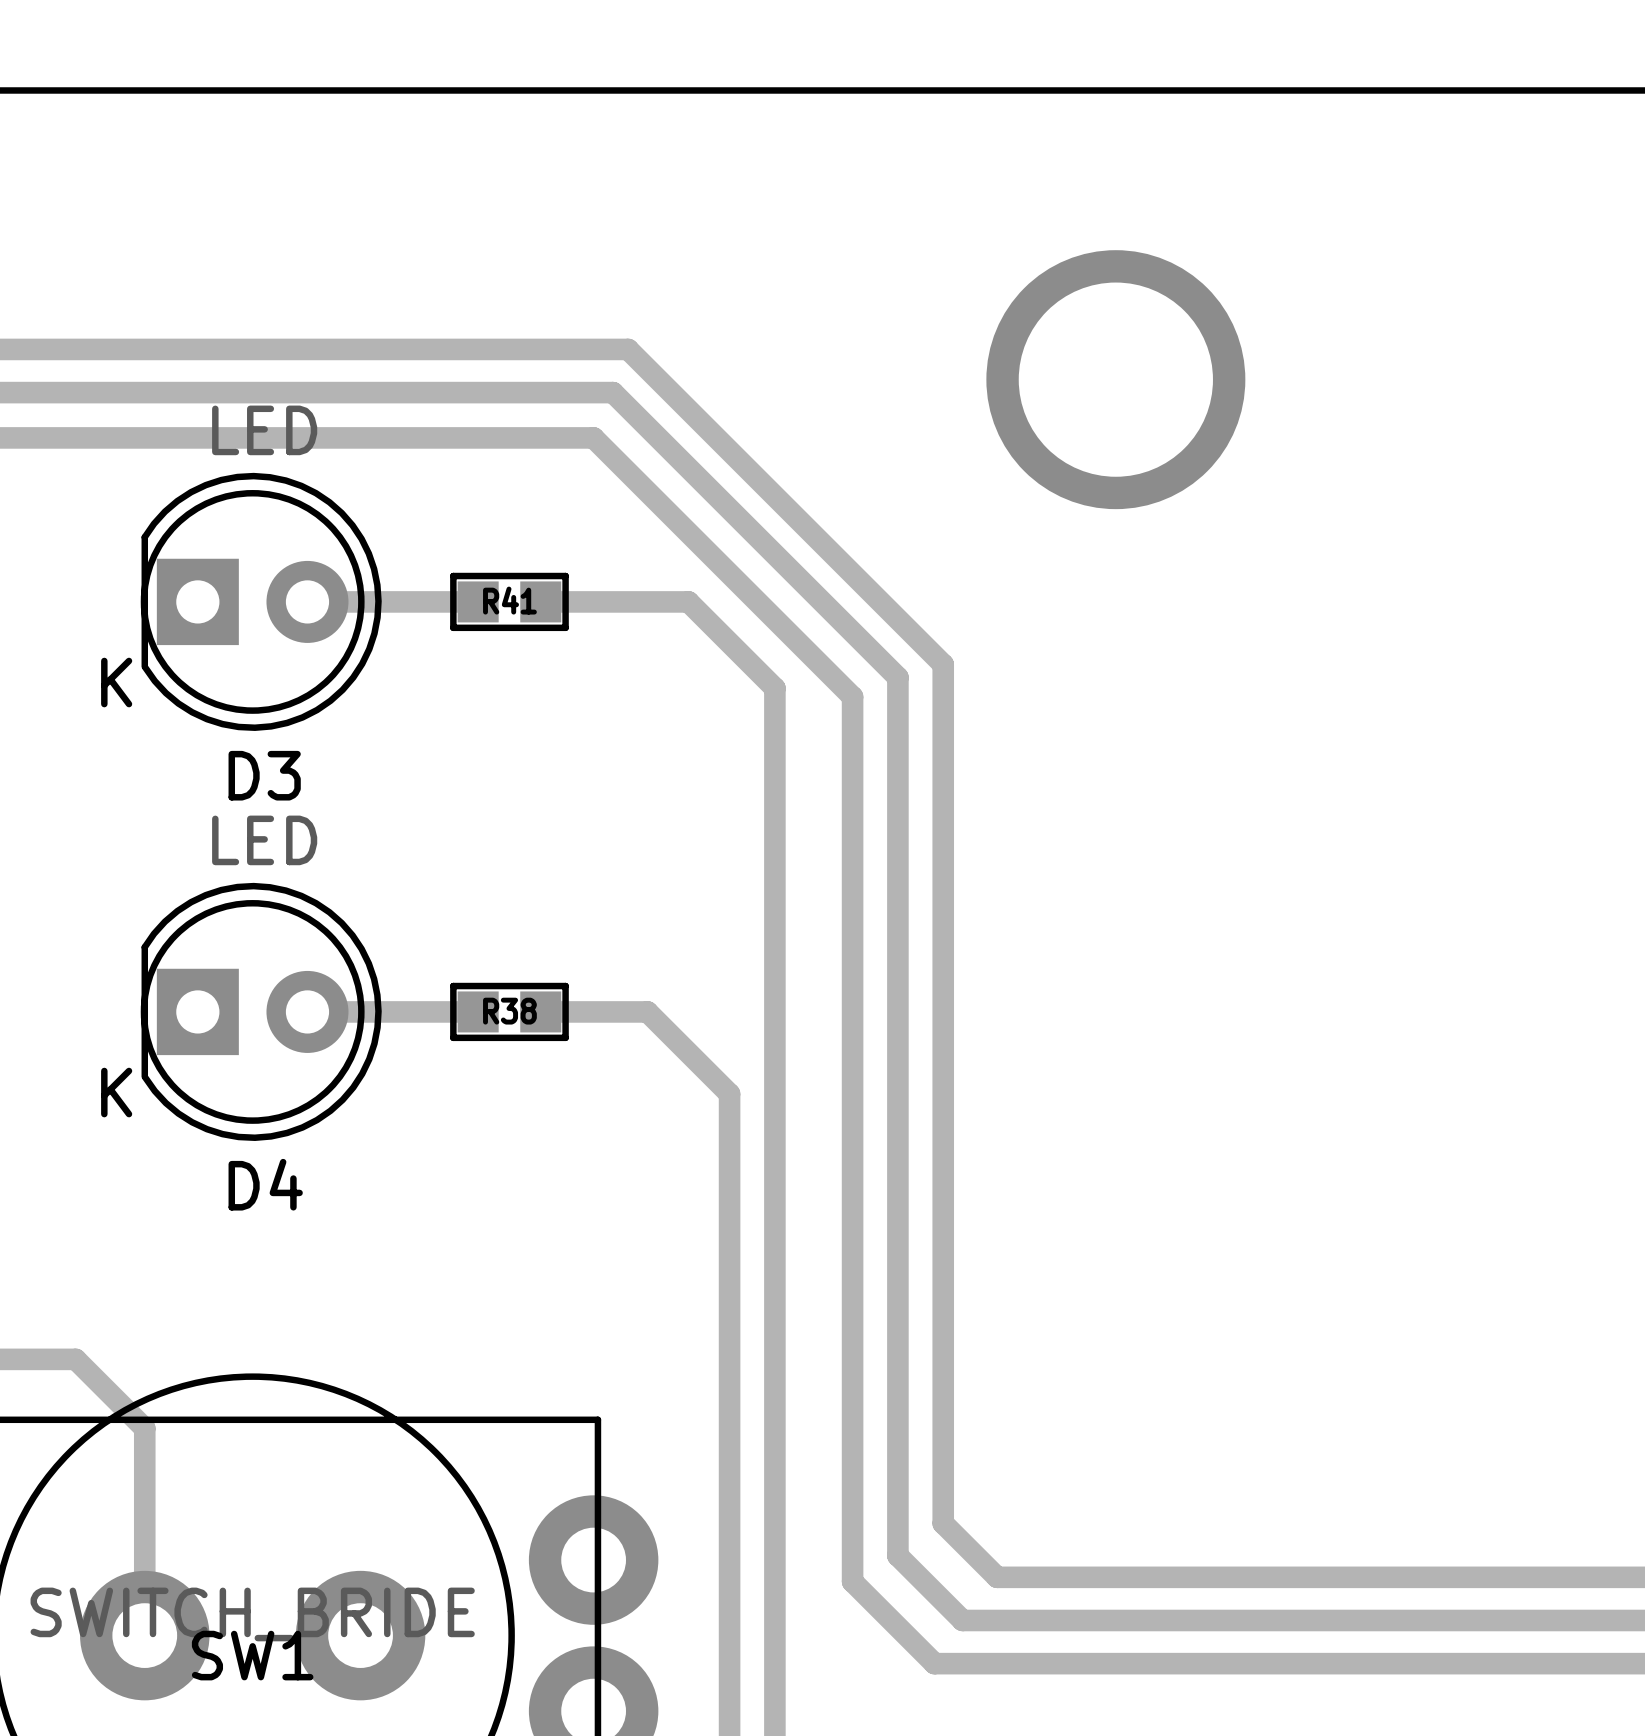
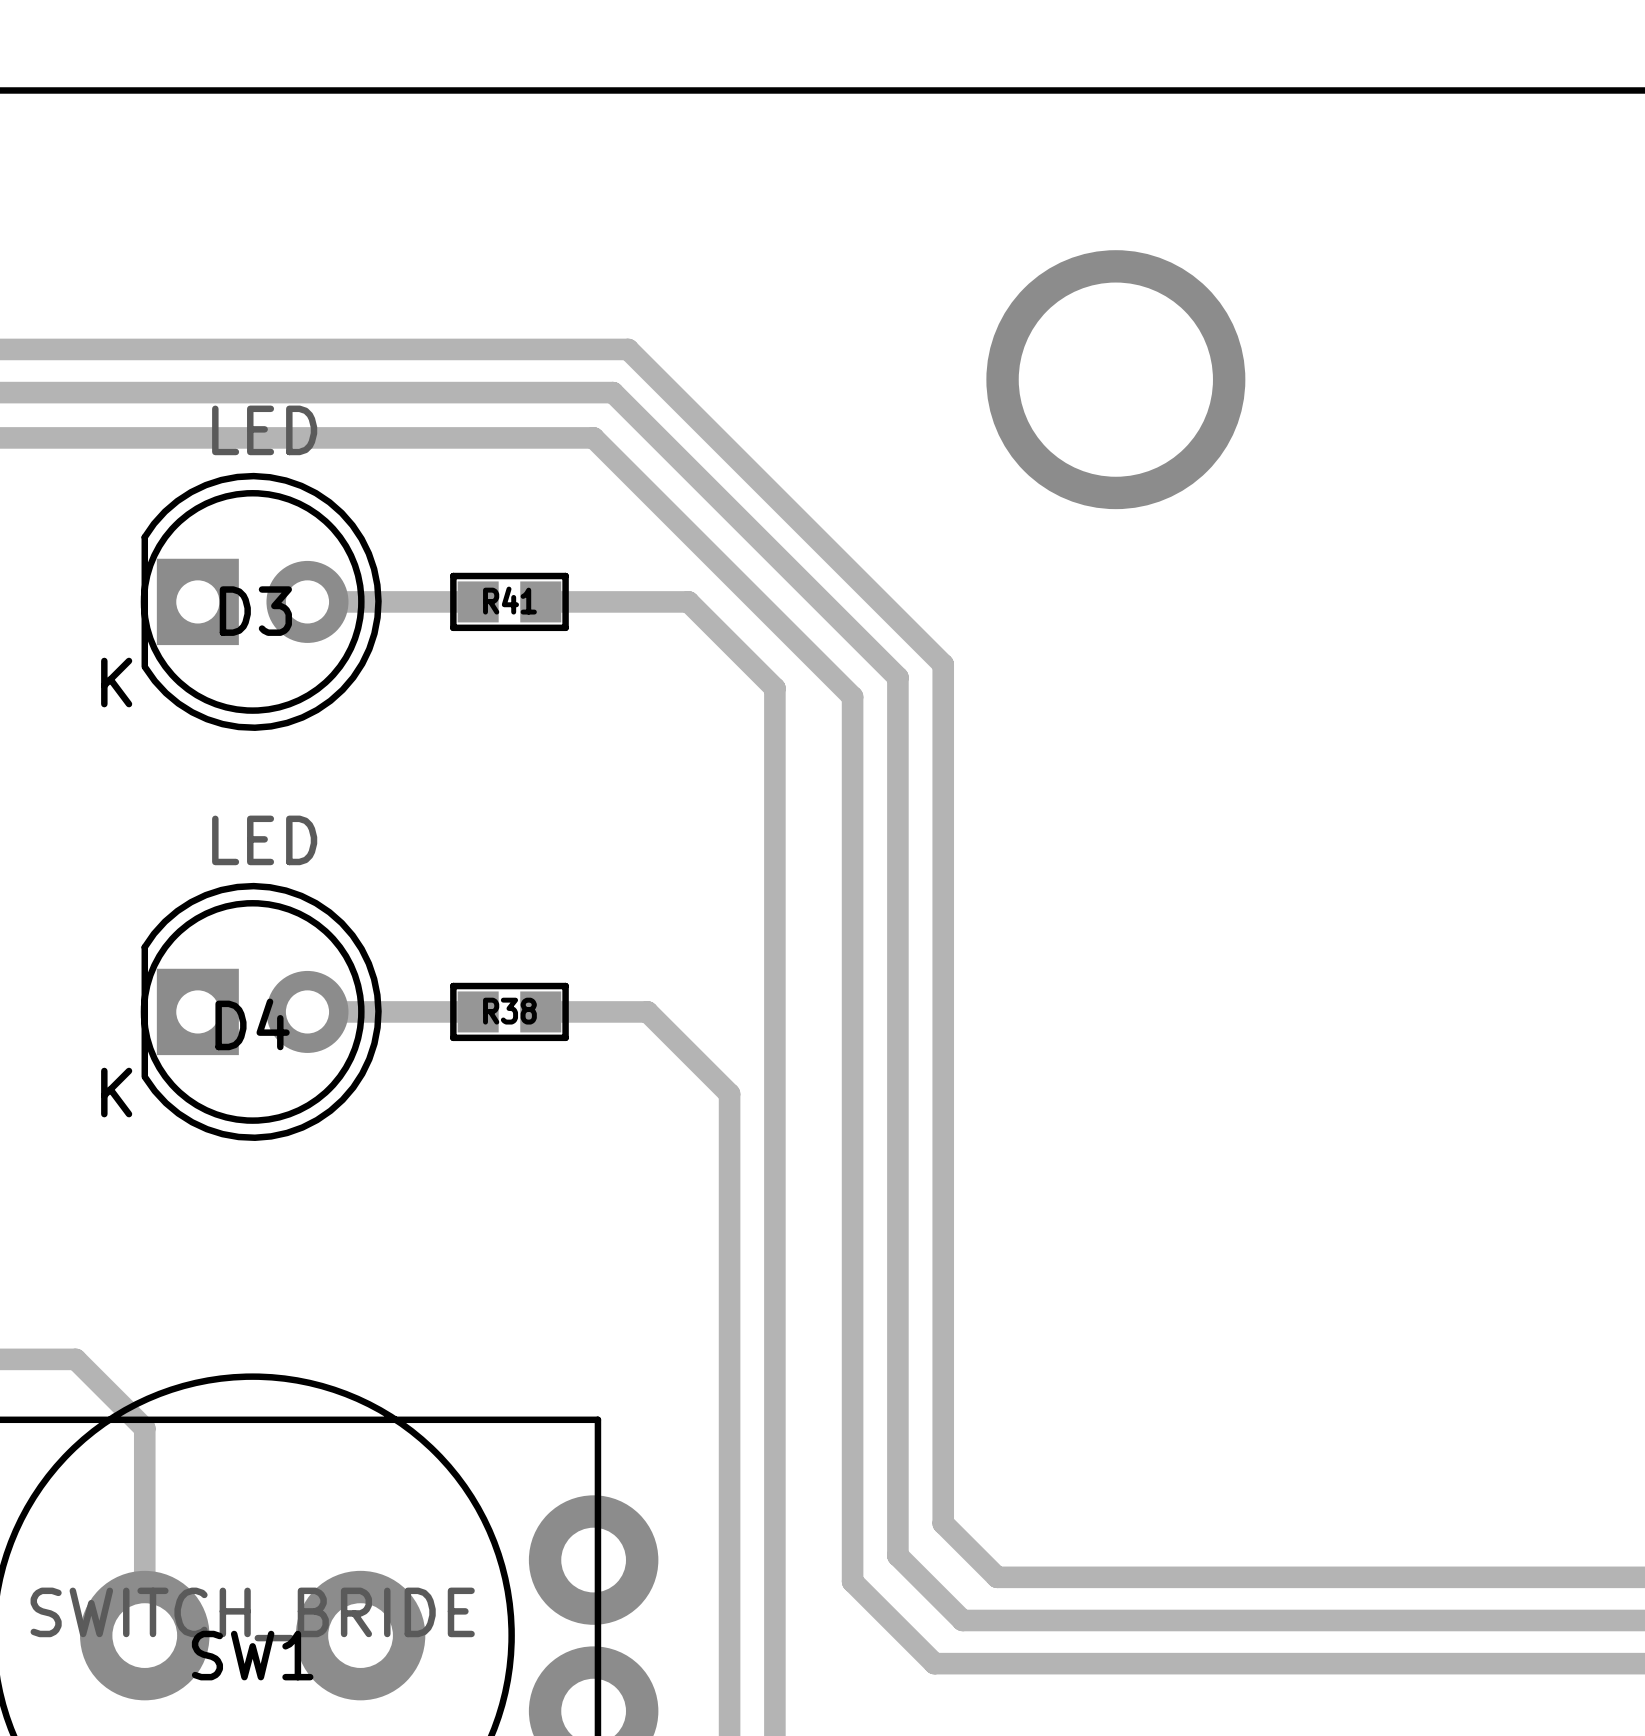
D3 name position: D3 (264, 775) -> D3 (255, 611)
D4 name position: D4 (265, 1184) -> D4 (252, 1024)

